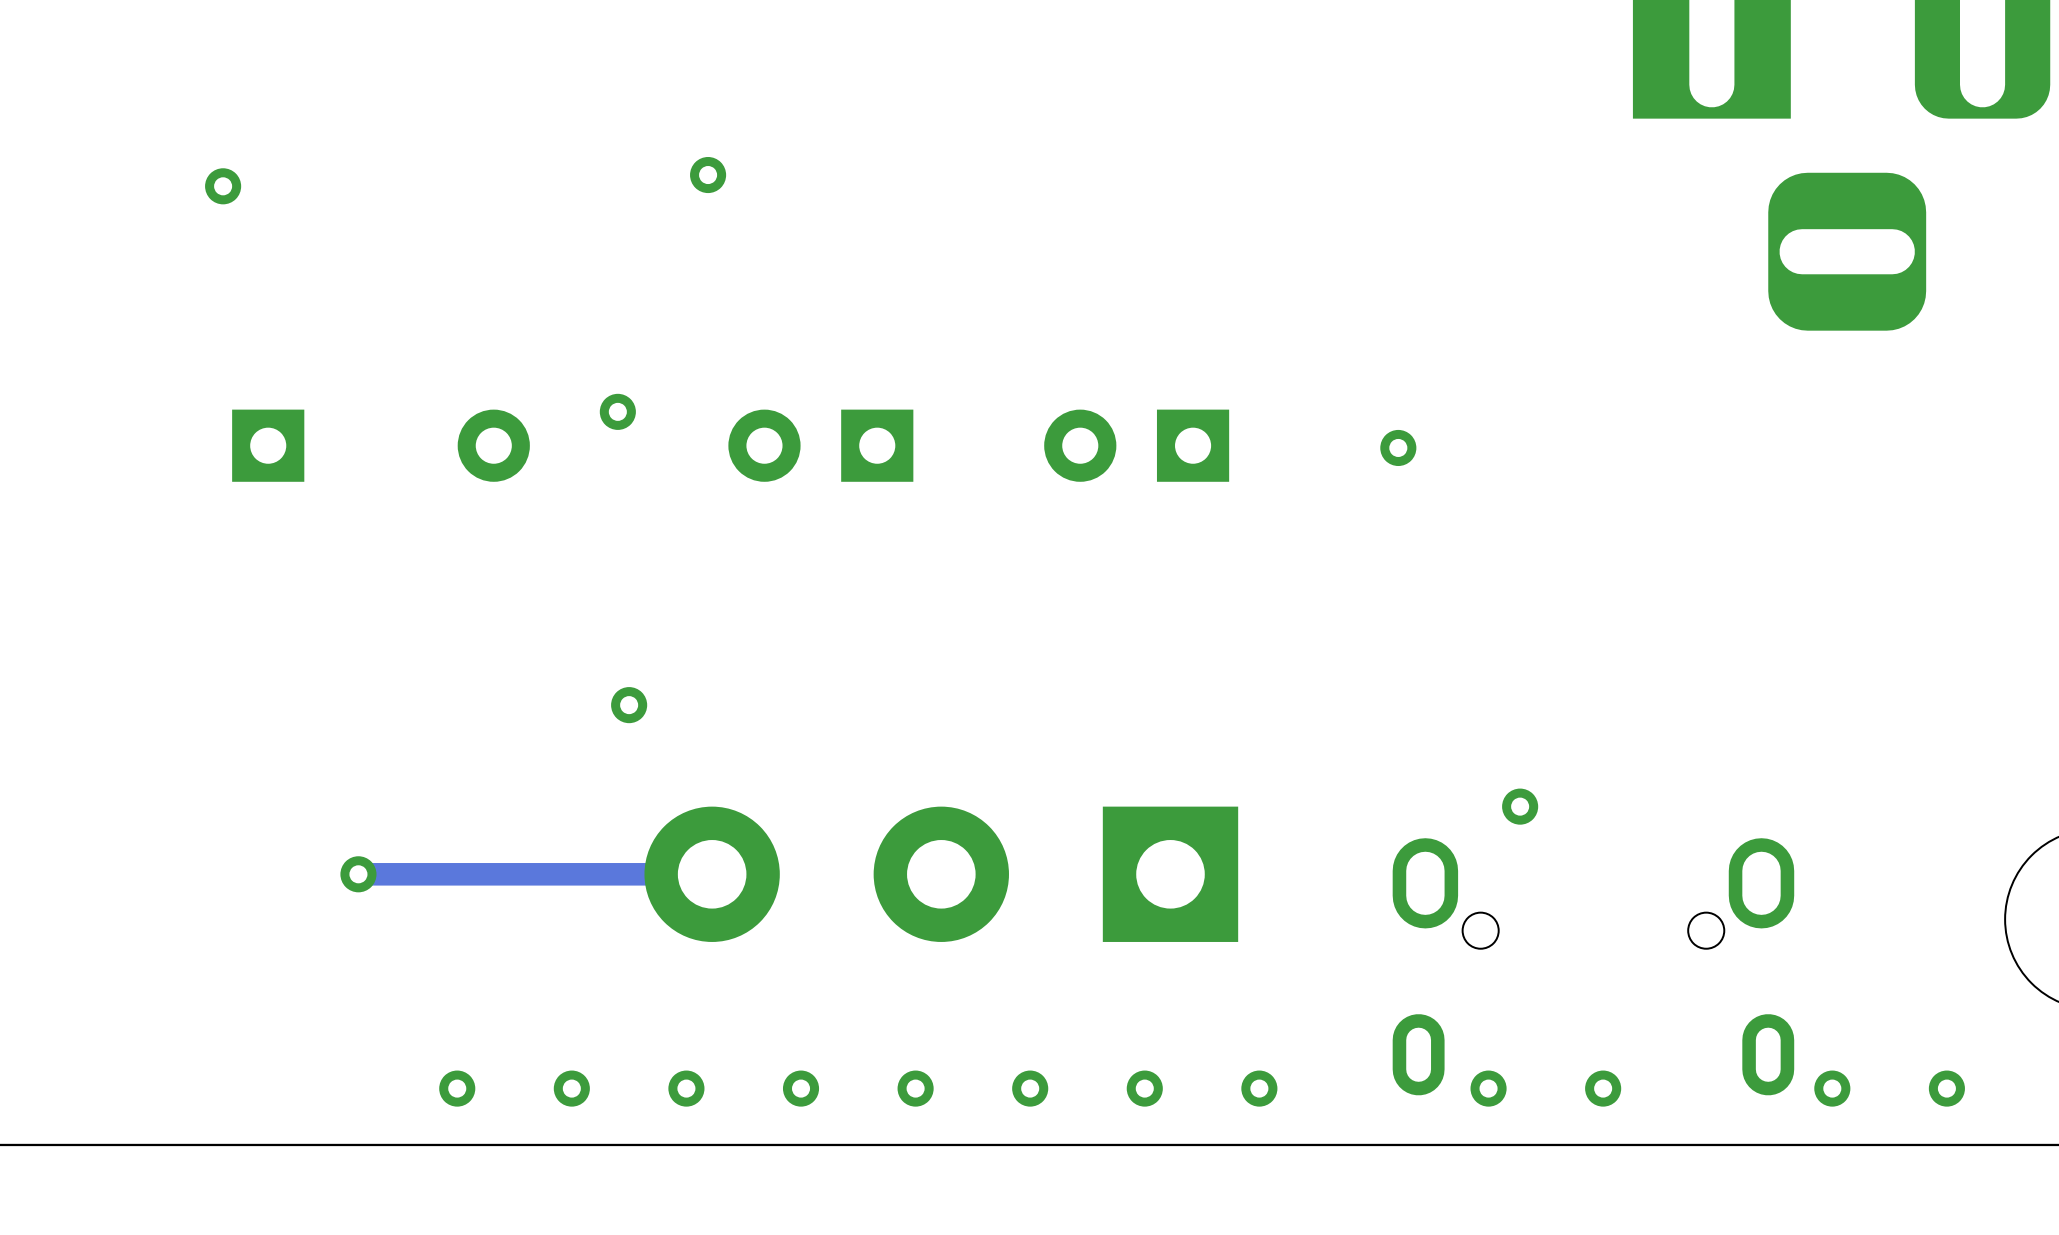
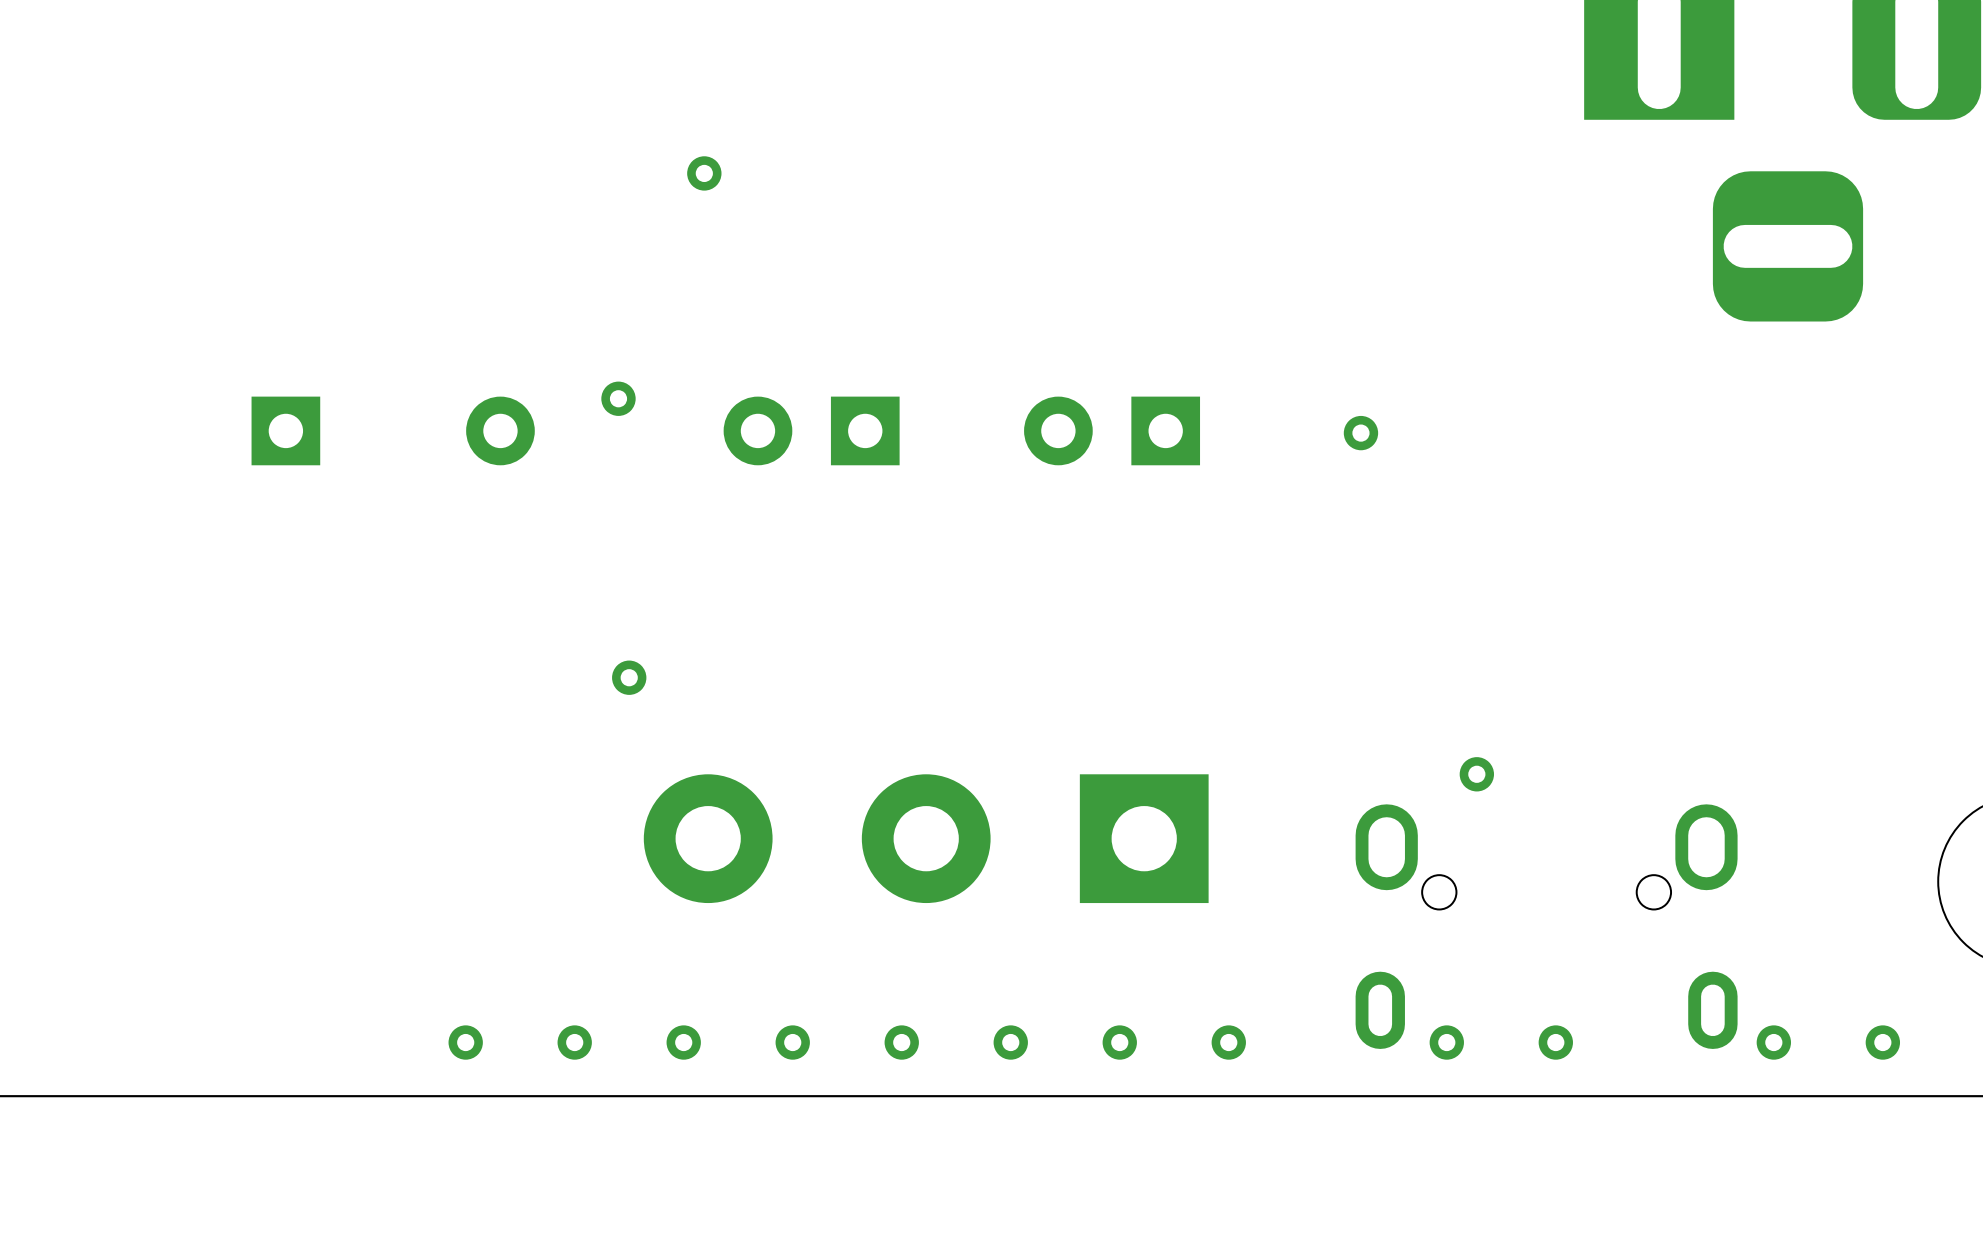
via: (223, 186) -> none
via: (358, 874) -> none
track: (712, 874) (358, 874) -> none

